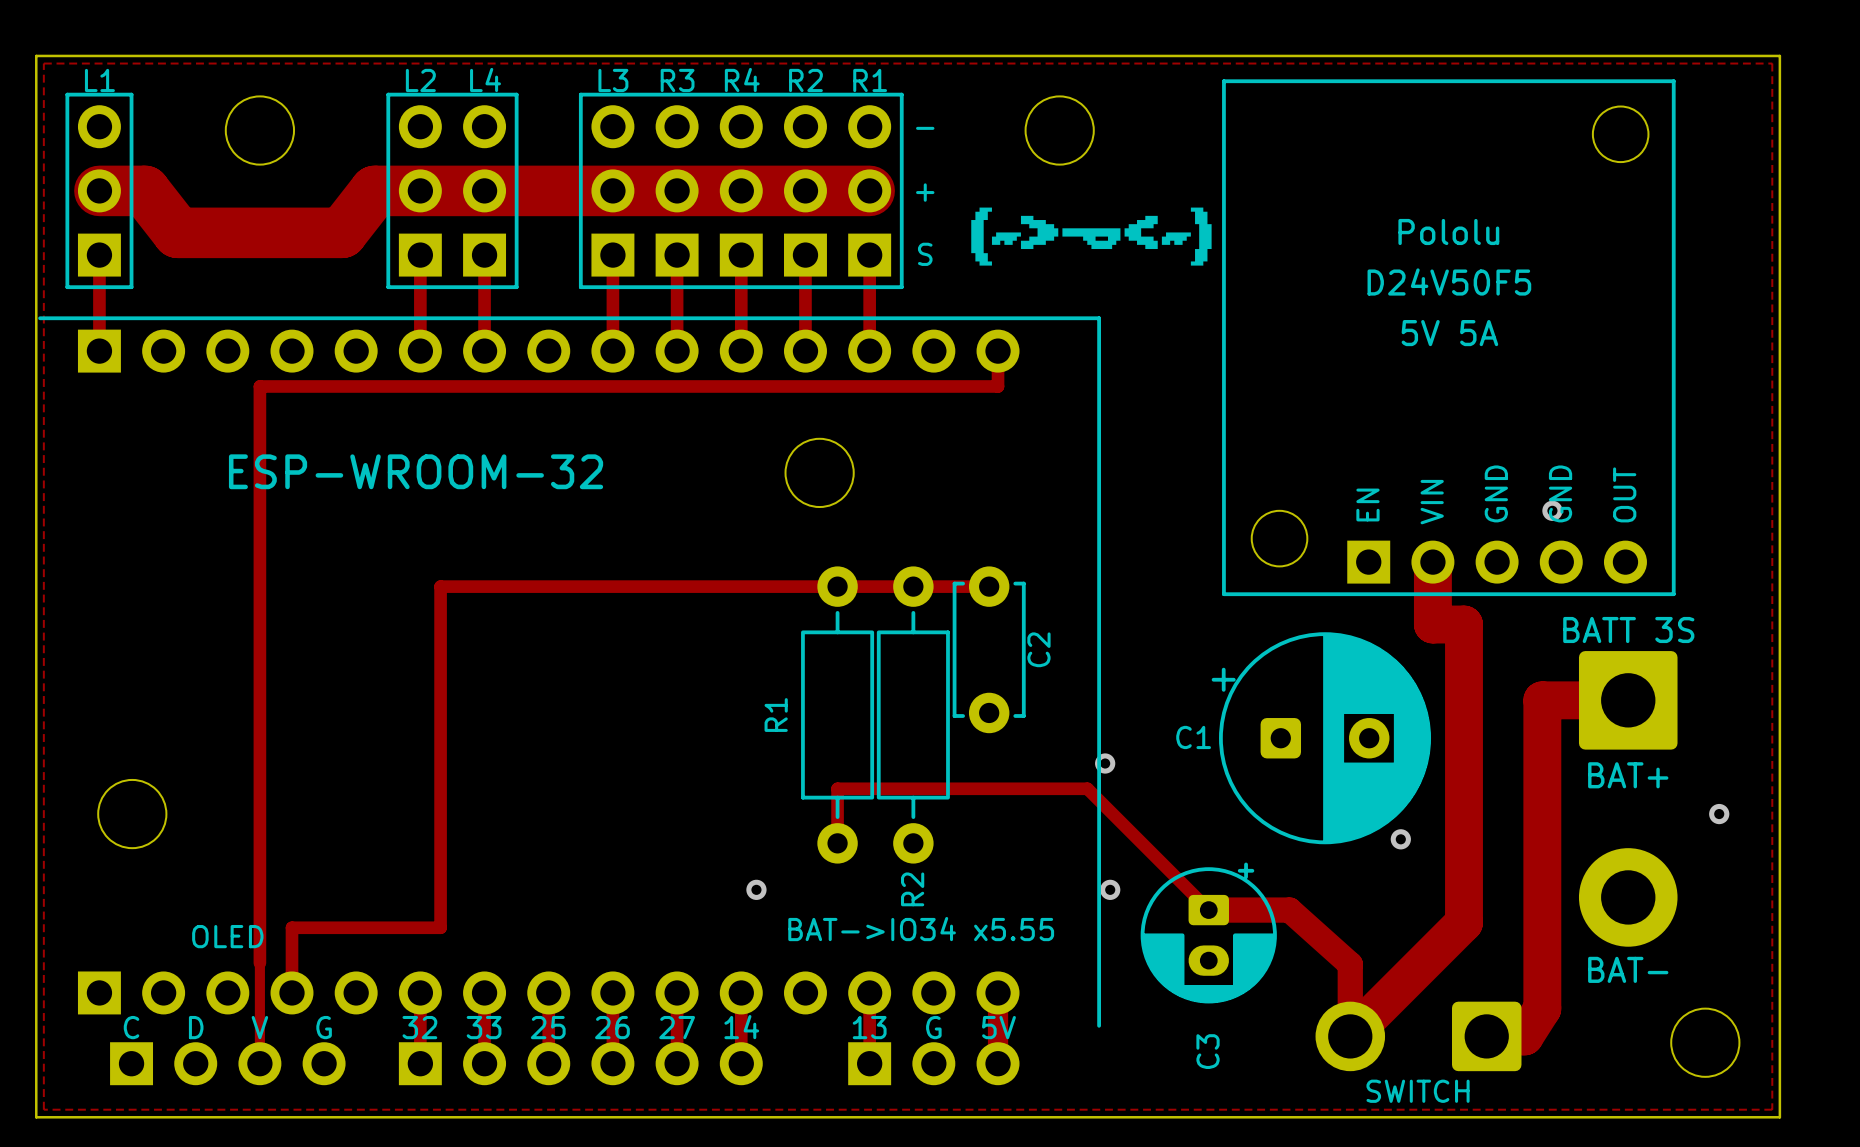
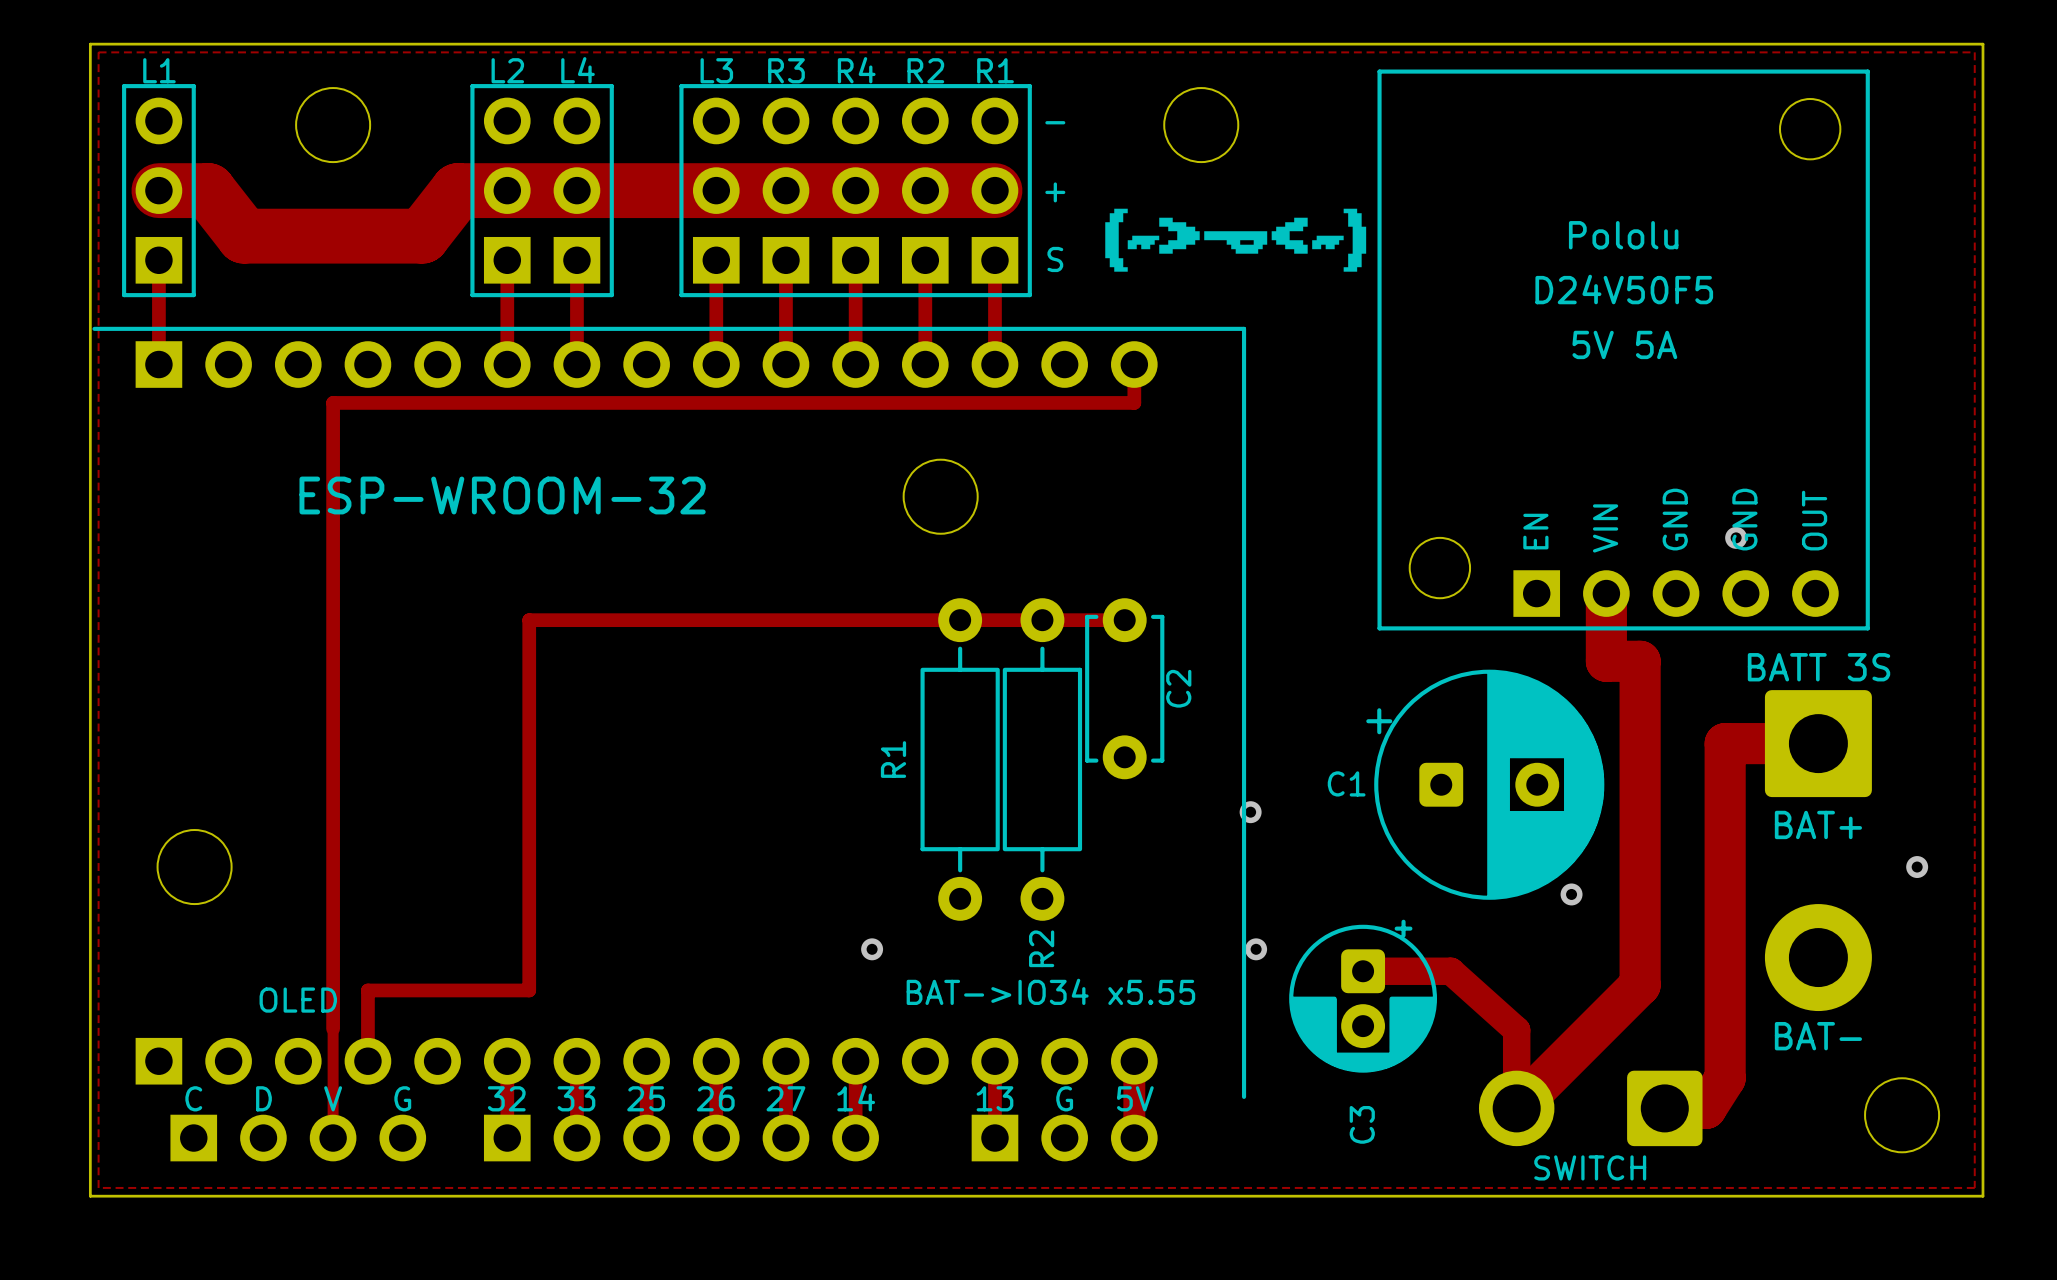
track: (837, 843) (837, 788) (1087, 788) (1208, 910) -> none
C3 footprint: [1140, 862, 1277, 1004] -> [1289, 919, 1438, 1073]

